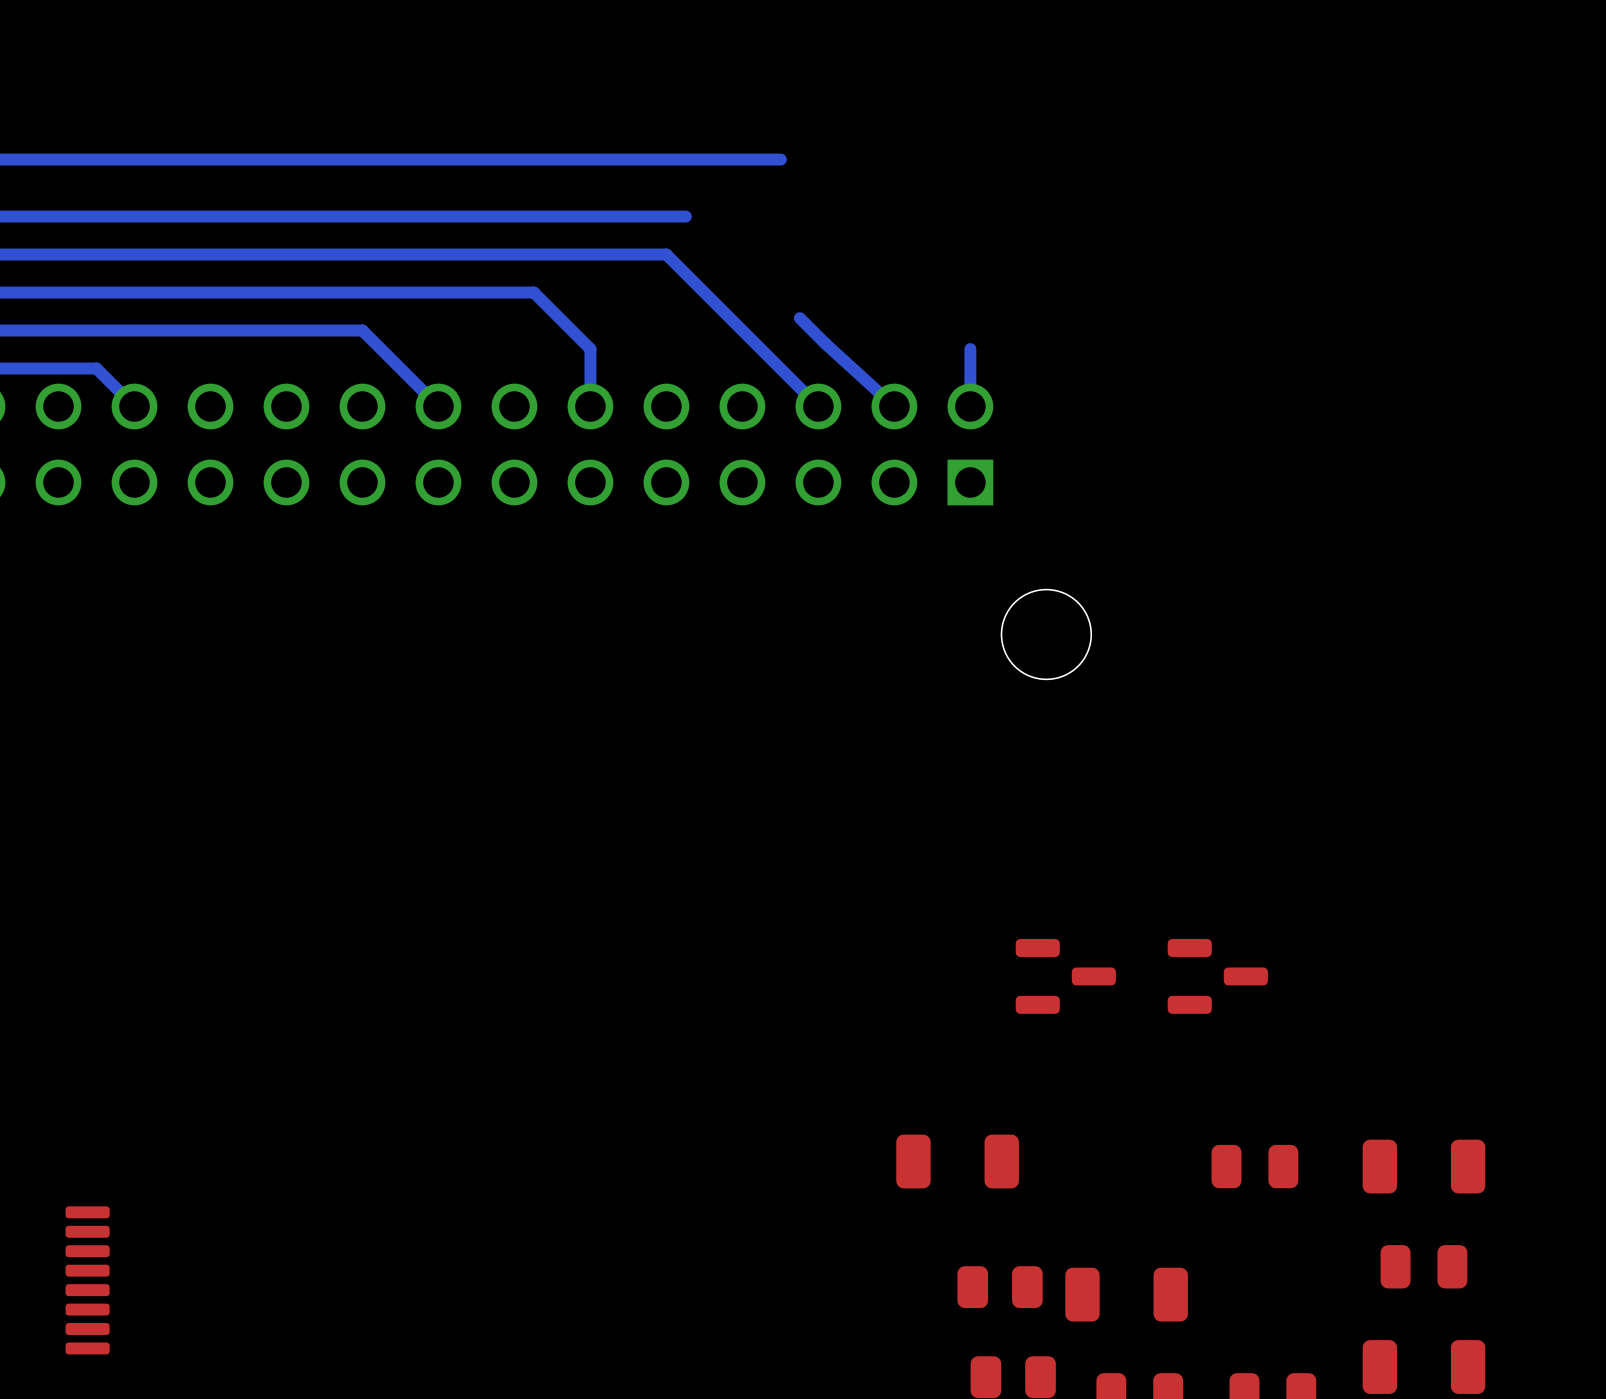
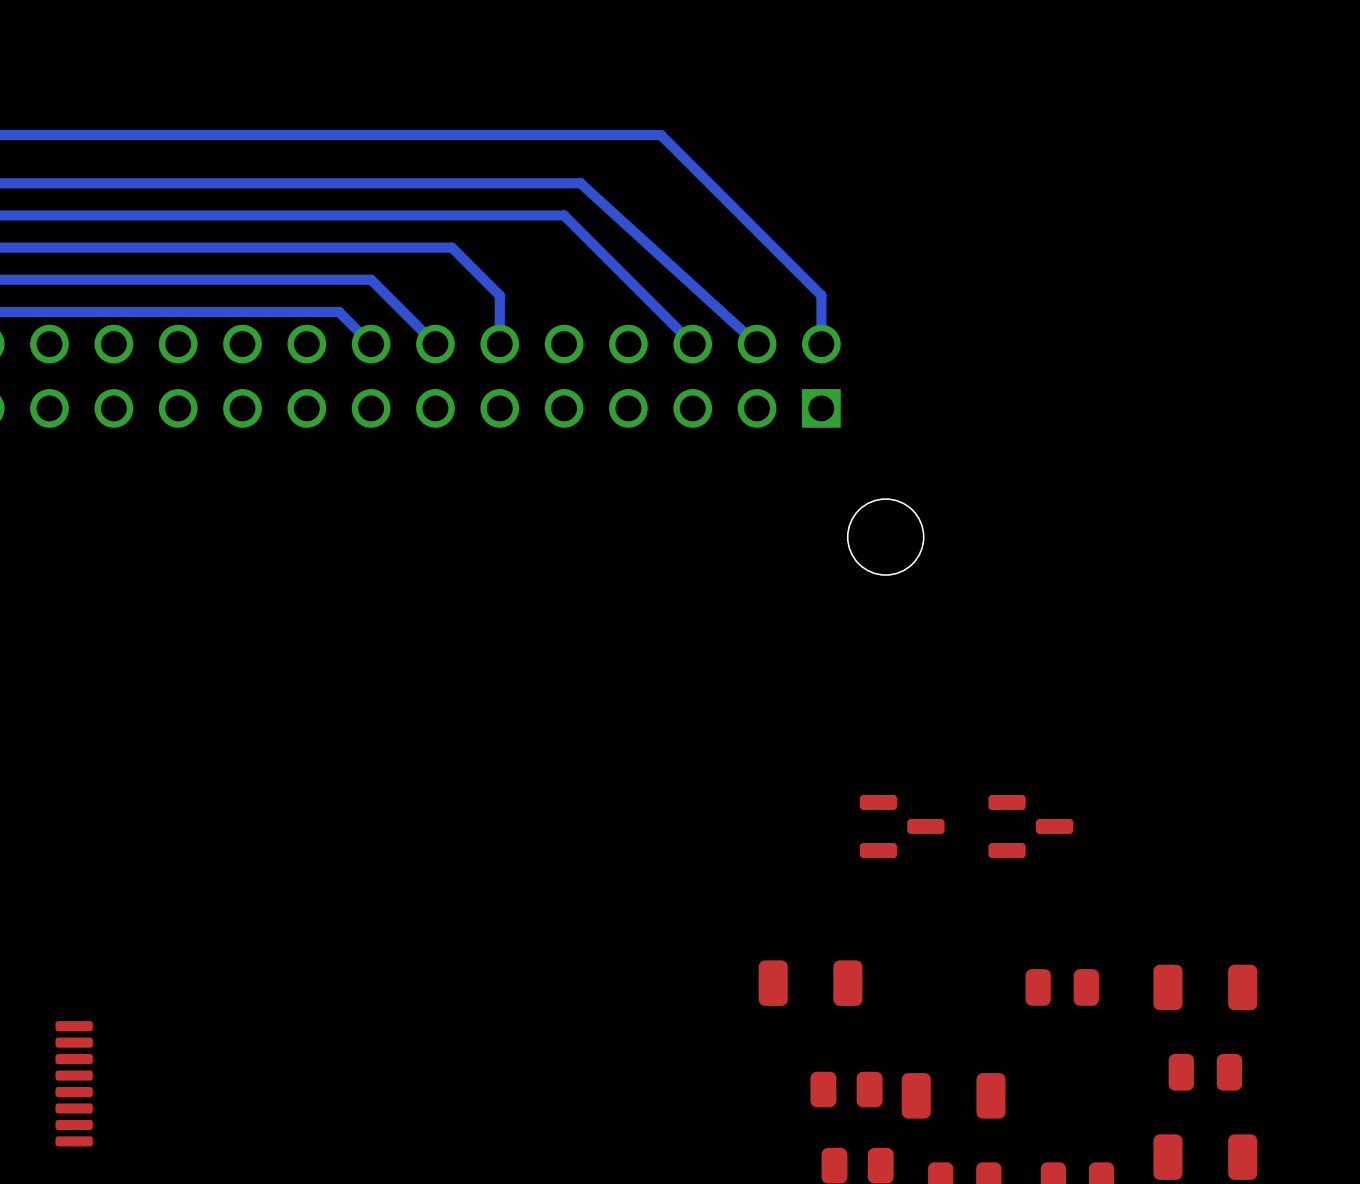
bottom track: none -> (660, 135) (821, 295)
bottom track: (799, 318) (825, 343) -> (580, 183) (698, 290)
bottom track: (362, 330) (400, 368) -> (306, 279) (371, 279) (435, 344)
bottom track: (96, 368) (134, 406) -> (81, 311) (338, 311)

